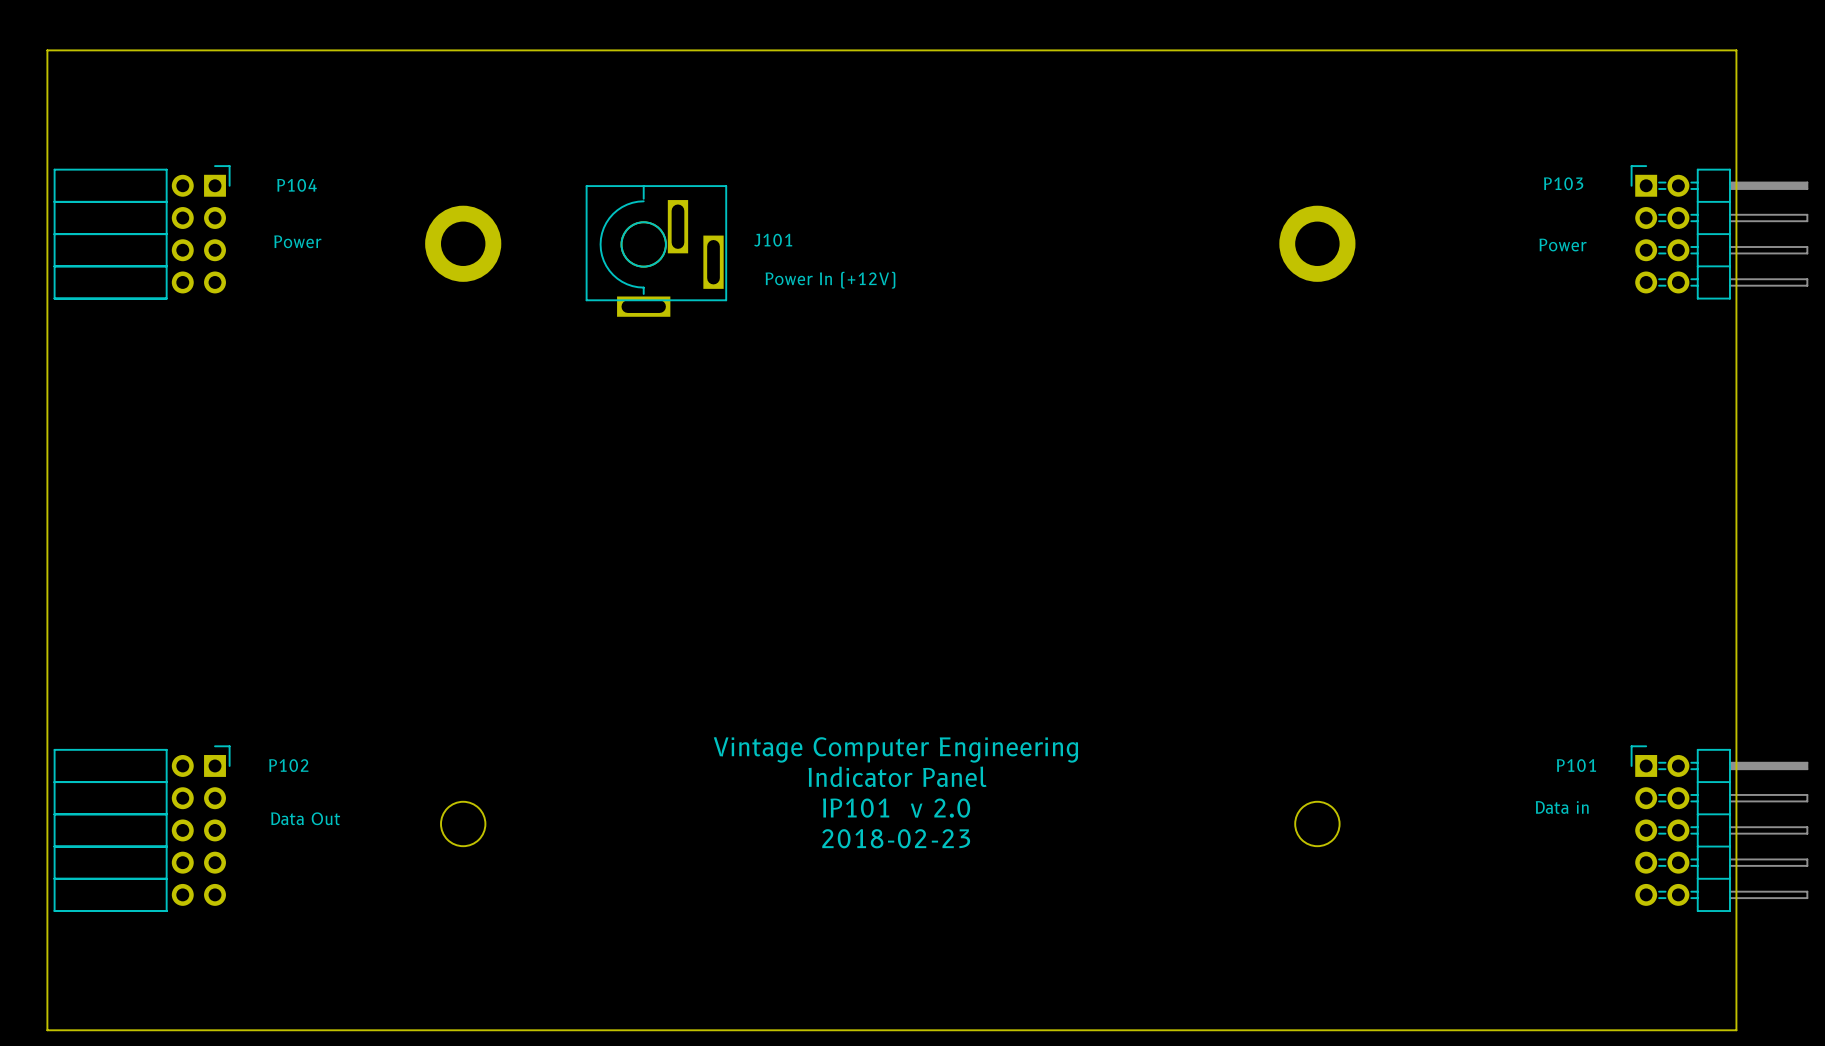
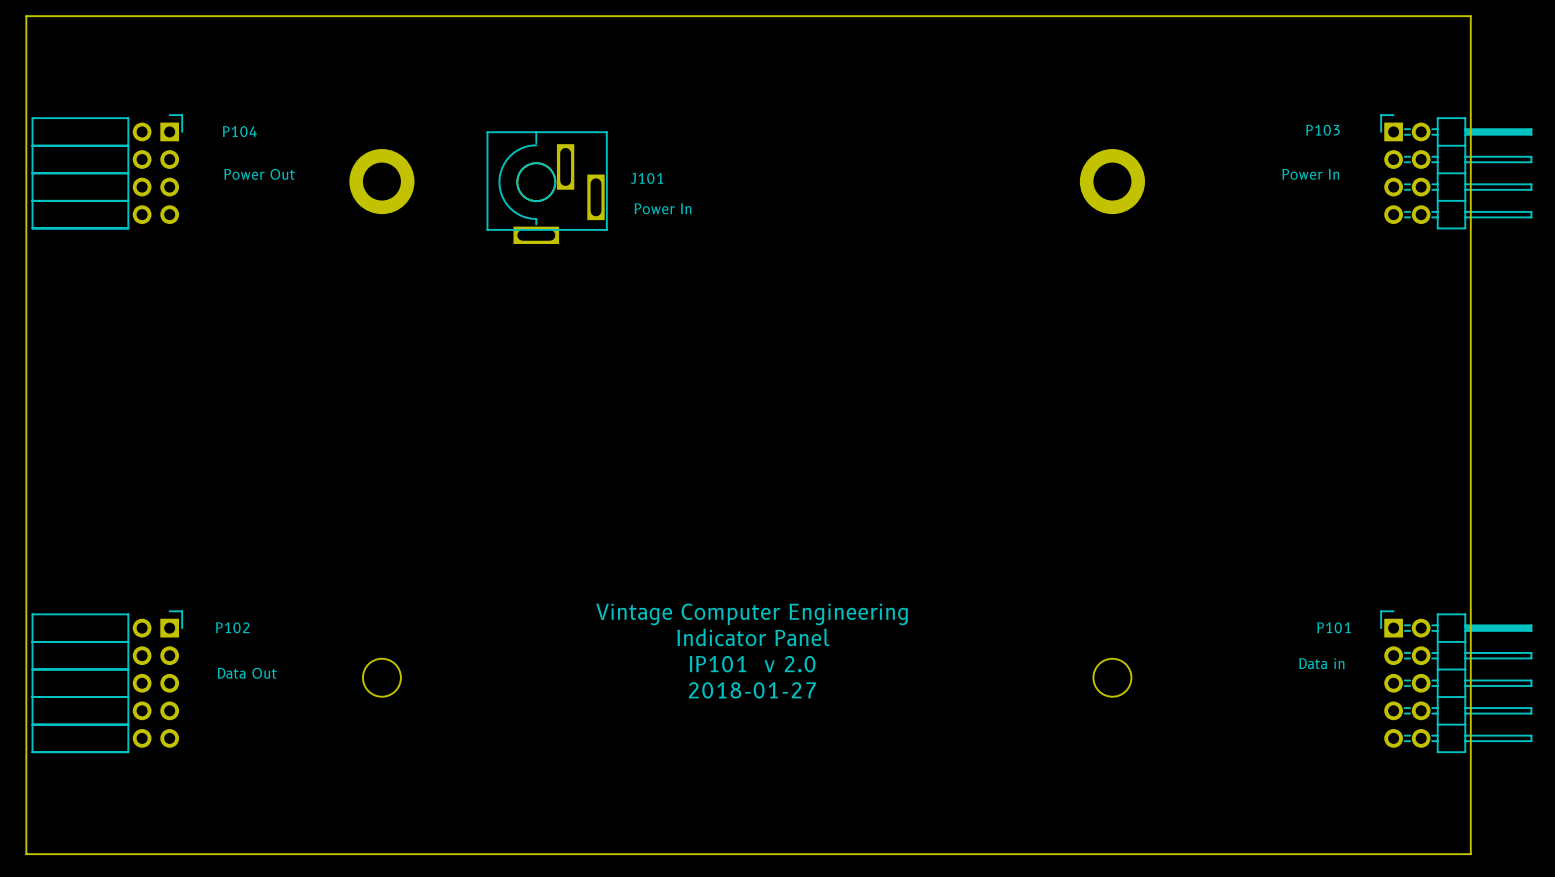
P103 footprint: [1630, 165, 1809, 300] -> [1380, 114, 1533, 230]
P104 value: Power (297, 241) -> Power Out (259, 174)
P103 value: Power (1563, 245) -> Power In (1310, 174)
J101 value: Power In (+12V) (830, 280) -> Power In (662, 208)
P101 footprint: [1630, 745, 1809, 912] -> [1380, 610, 1533, 753]
text: 2018-02-23 (896, 838) -> 2018-01-27 (752, 690)

